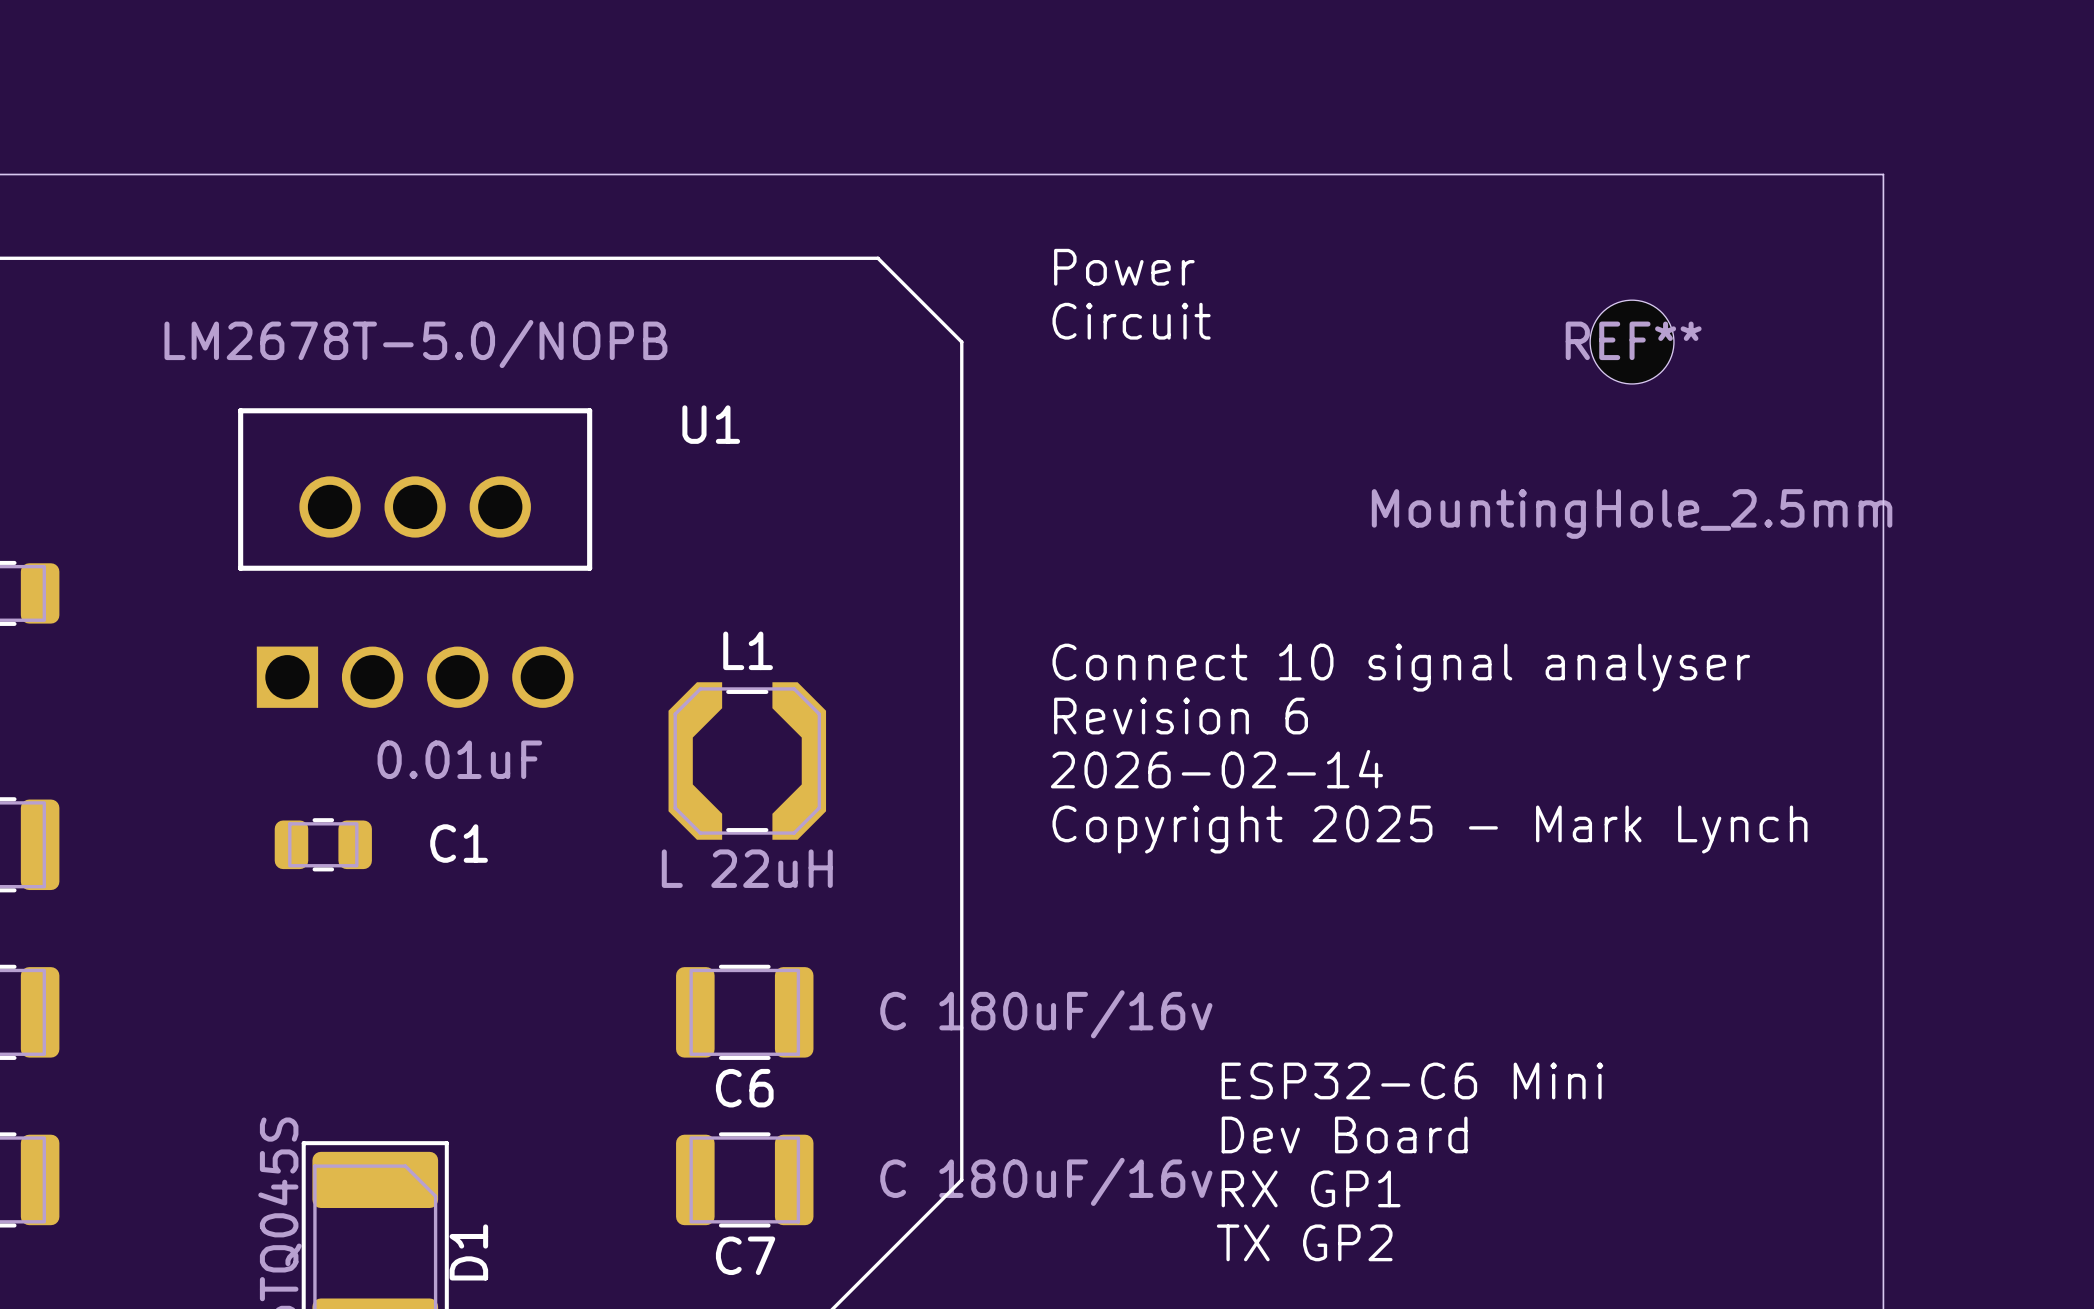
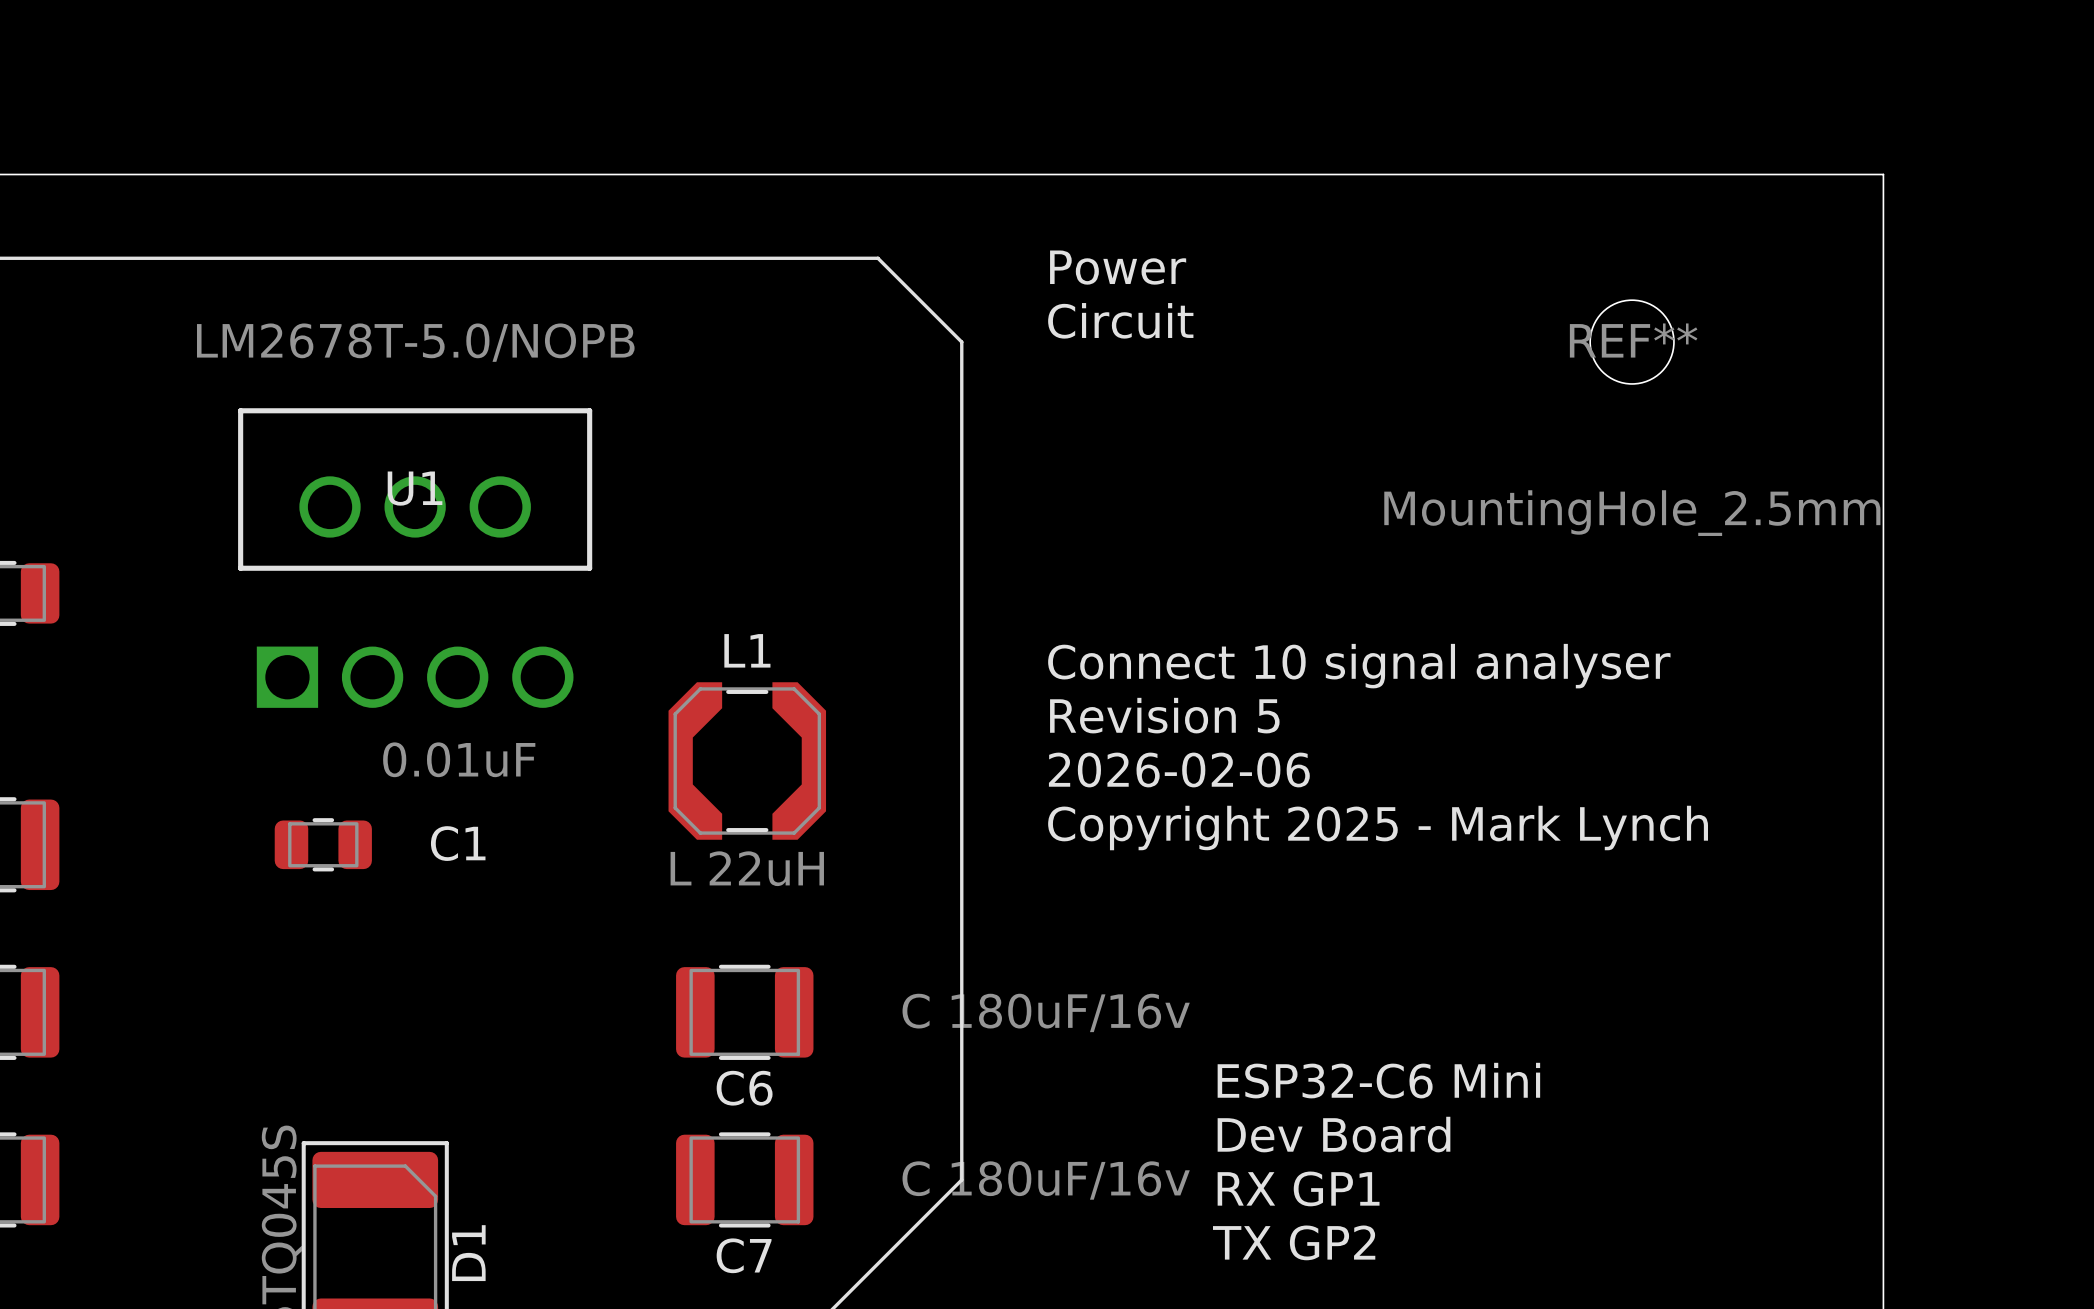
U1 name position: U1 (711, 424) -> U1 (415, 488)
text: Revision 6 (1181, 716) -> Revision 5 (1164, 715)
text: 2026-02-14 (1216, 769) -> 2026-02-06 (1179, 769)

